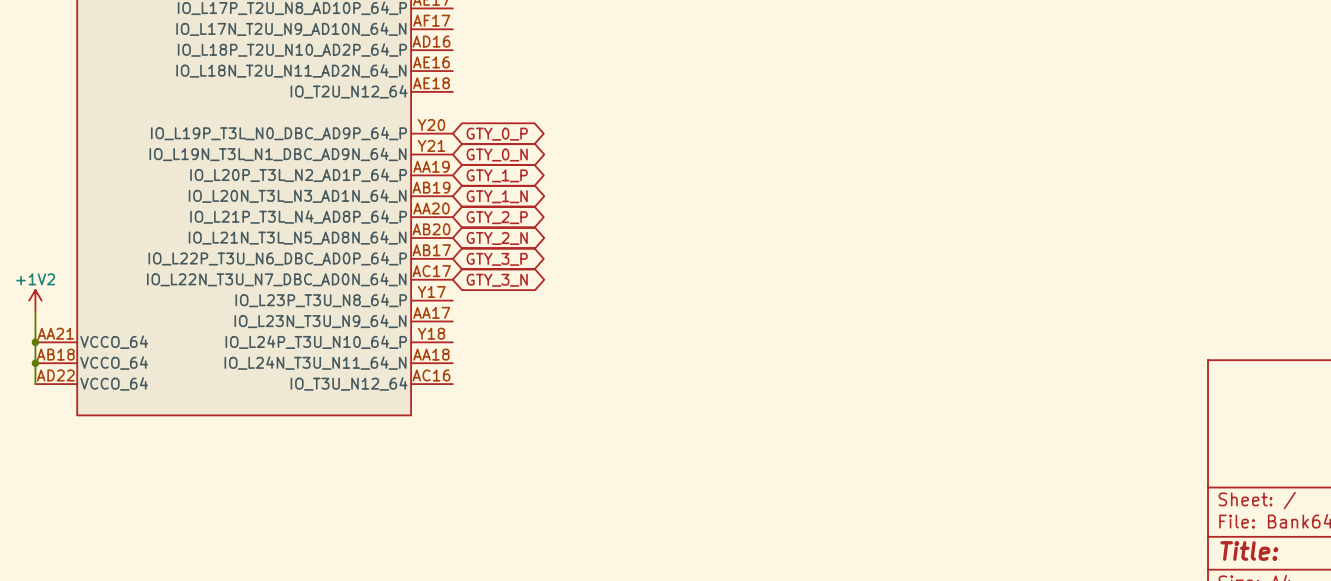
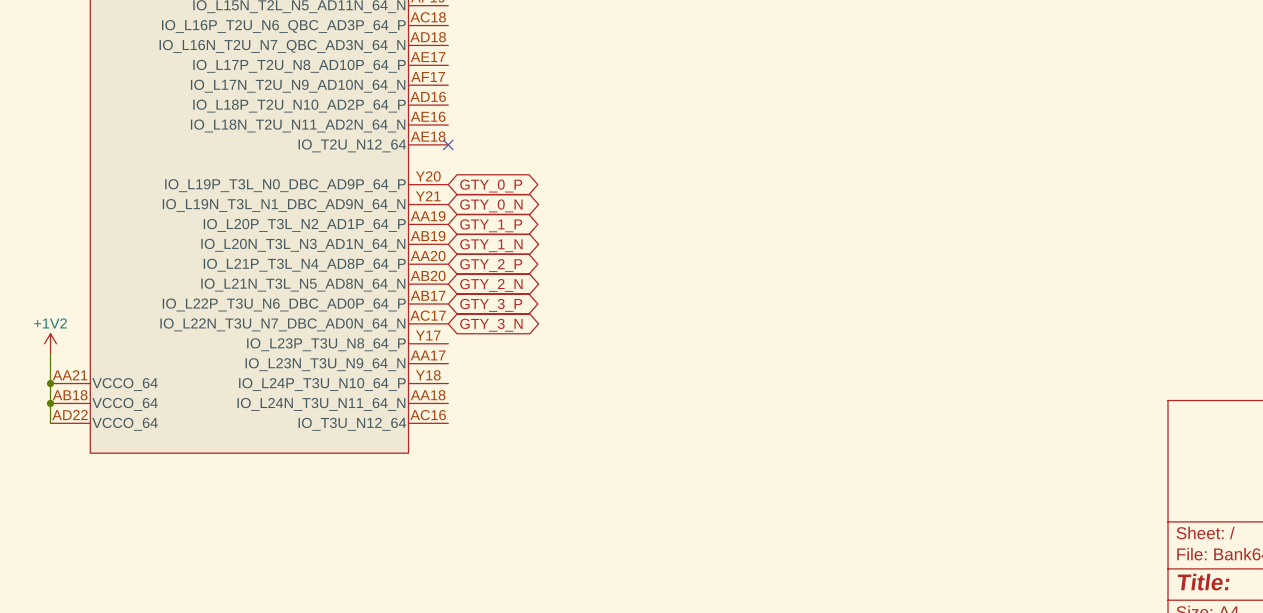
no-connect mark: none -> (448, 144)

